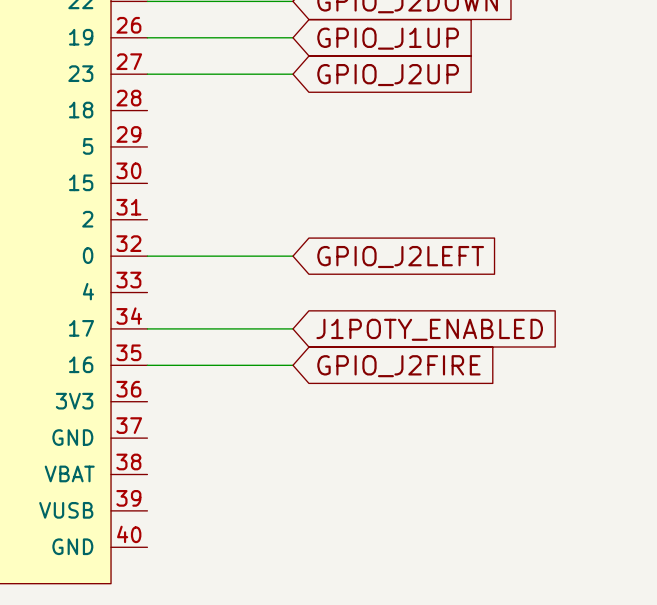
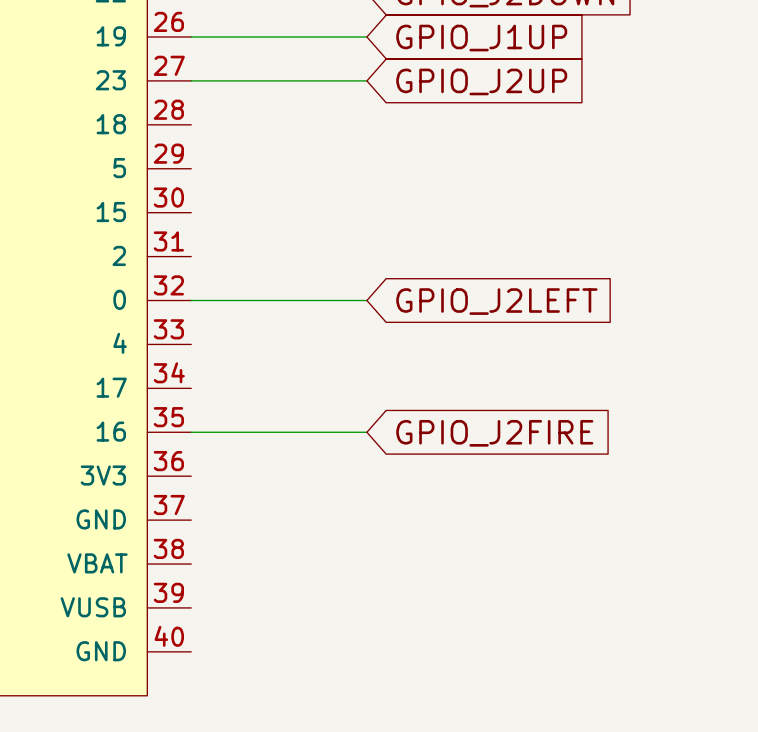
wire: (147, 328) (292, 328) -> none
global label: J1POTY_ENABLED (429, 329) -> none

